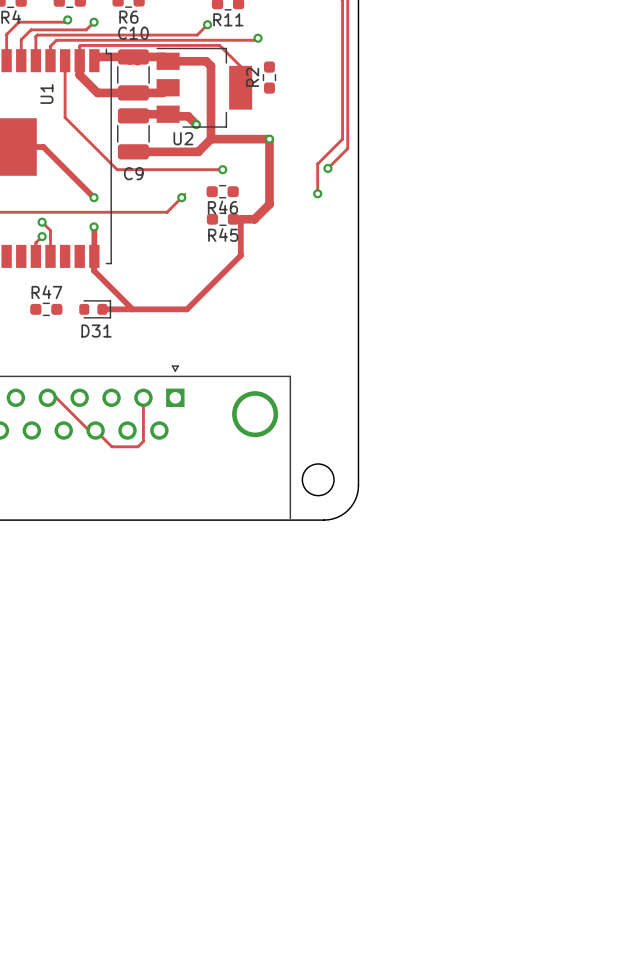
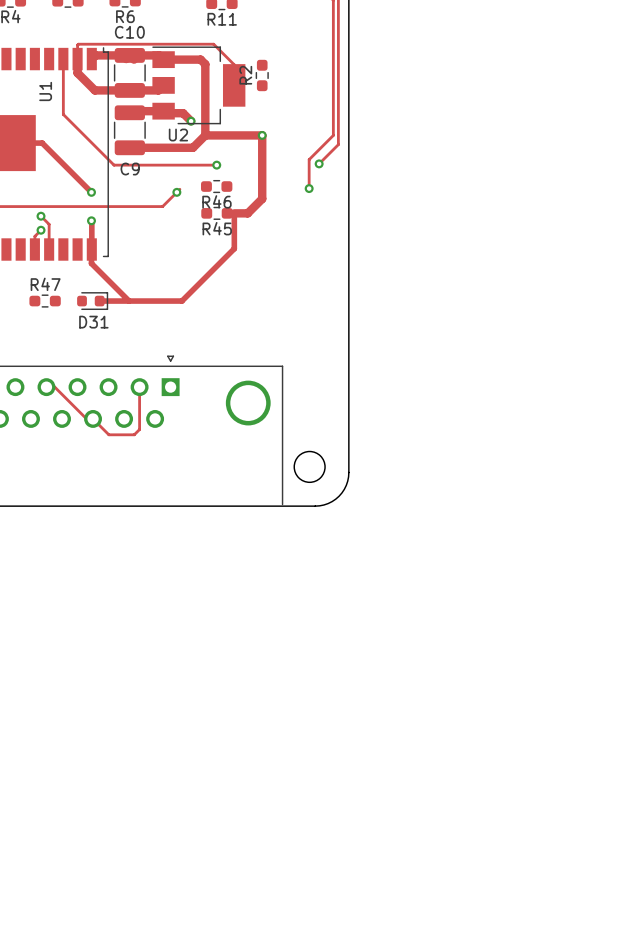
track: (67, 19) (65, 22) (18, 22) (6, 34) (6, 60) -> none
via: (67, 19) -> none
track: (94, 22) (86, 29) (31, 29) (21, 39) (21, 60) -> none
via: (94, 22) -> none
track: (207, 24) (197, 35) (37, 35) (35, 60) -> none
via: (207, 24) -> none
track: (258, 38) (255, 40) (56, 40) (50, 46) (50, 60) -> none
via: (258, 38) -> none

